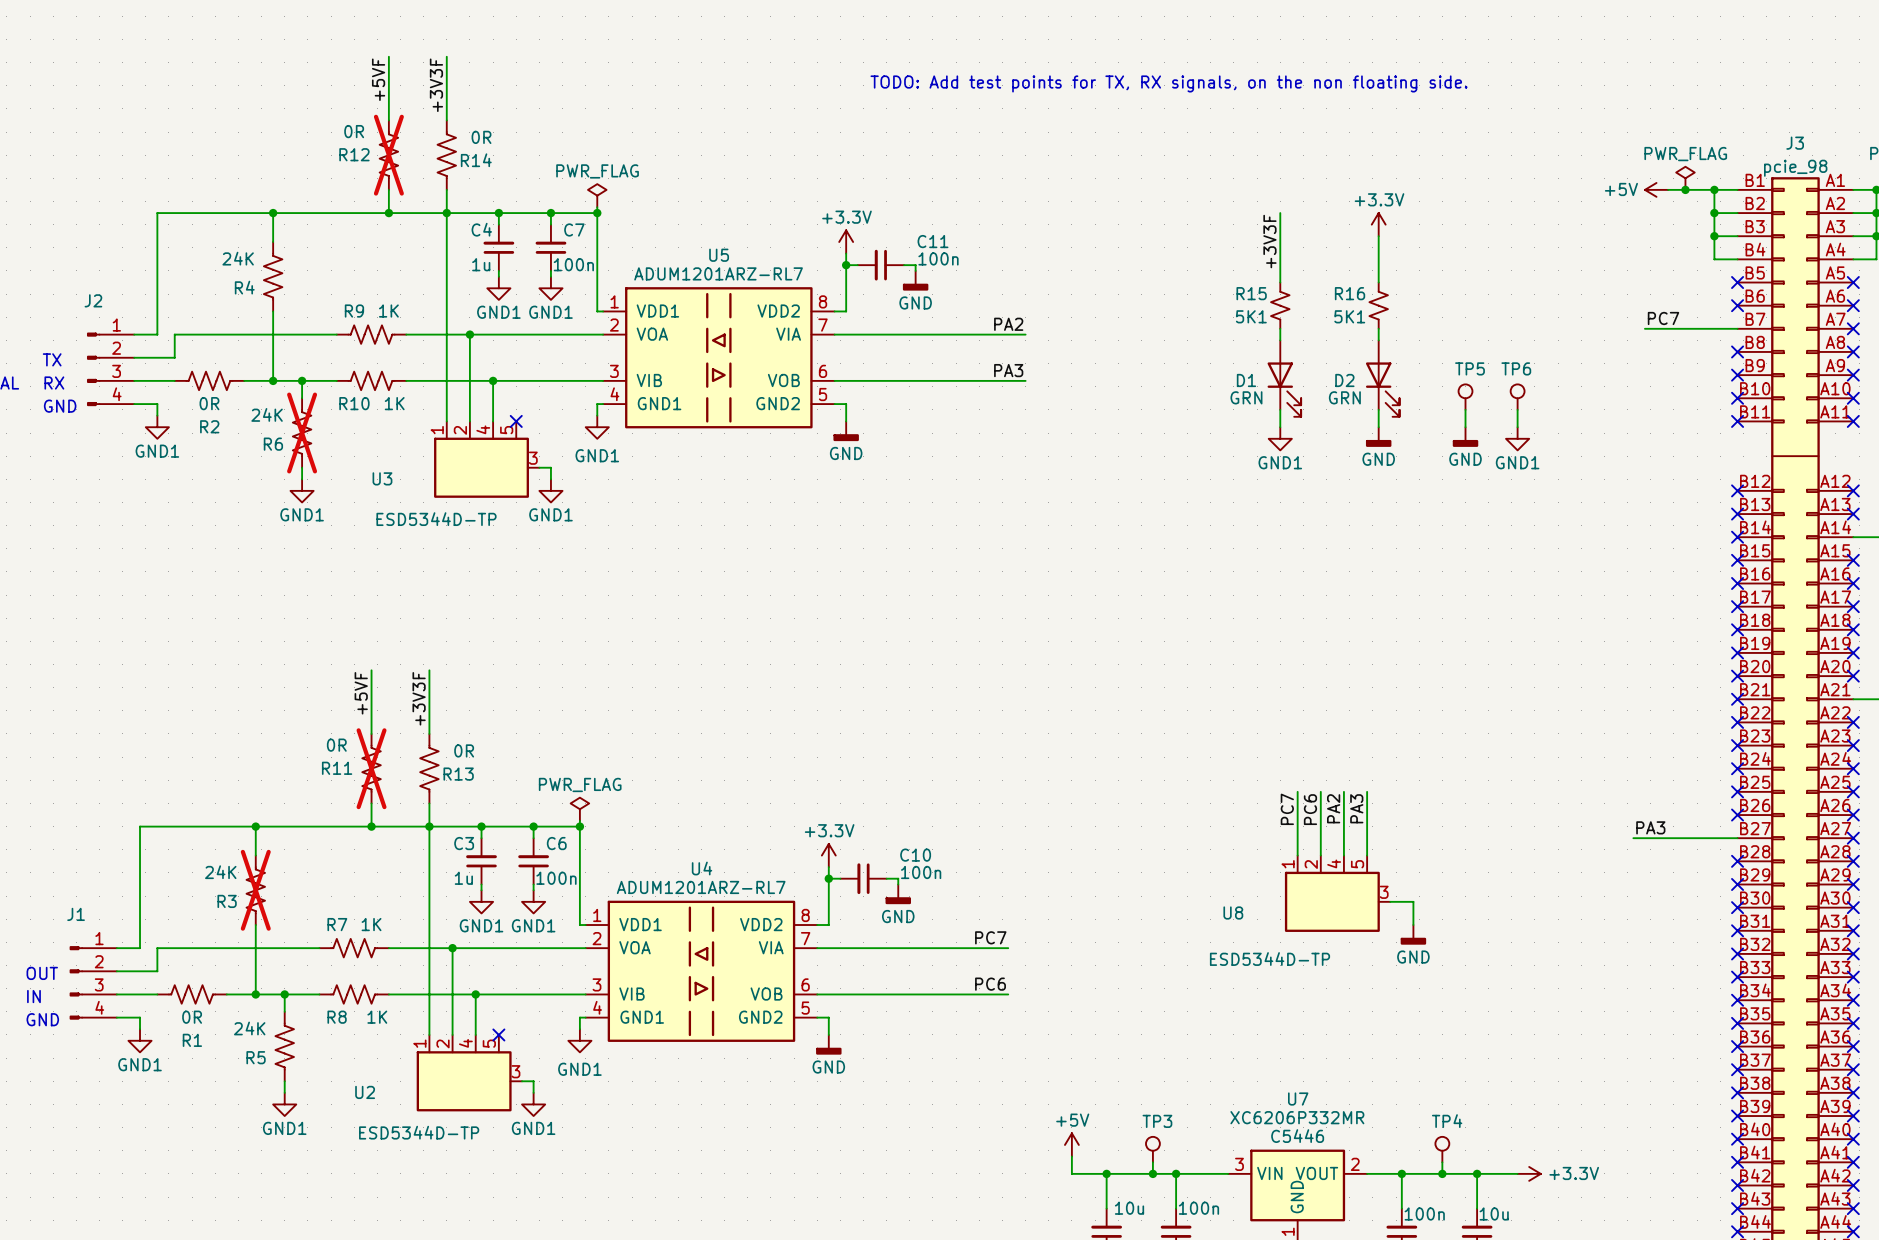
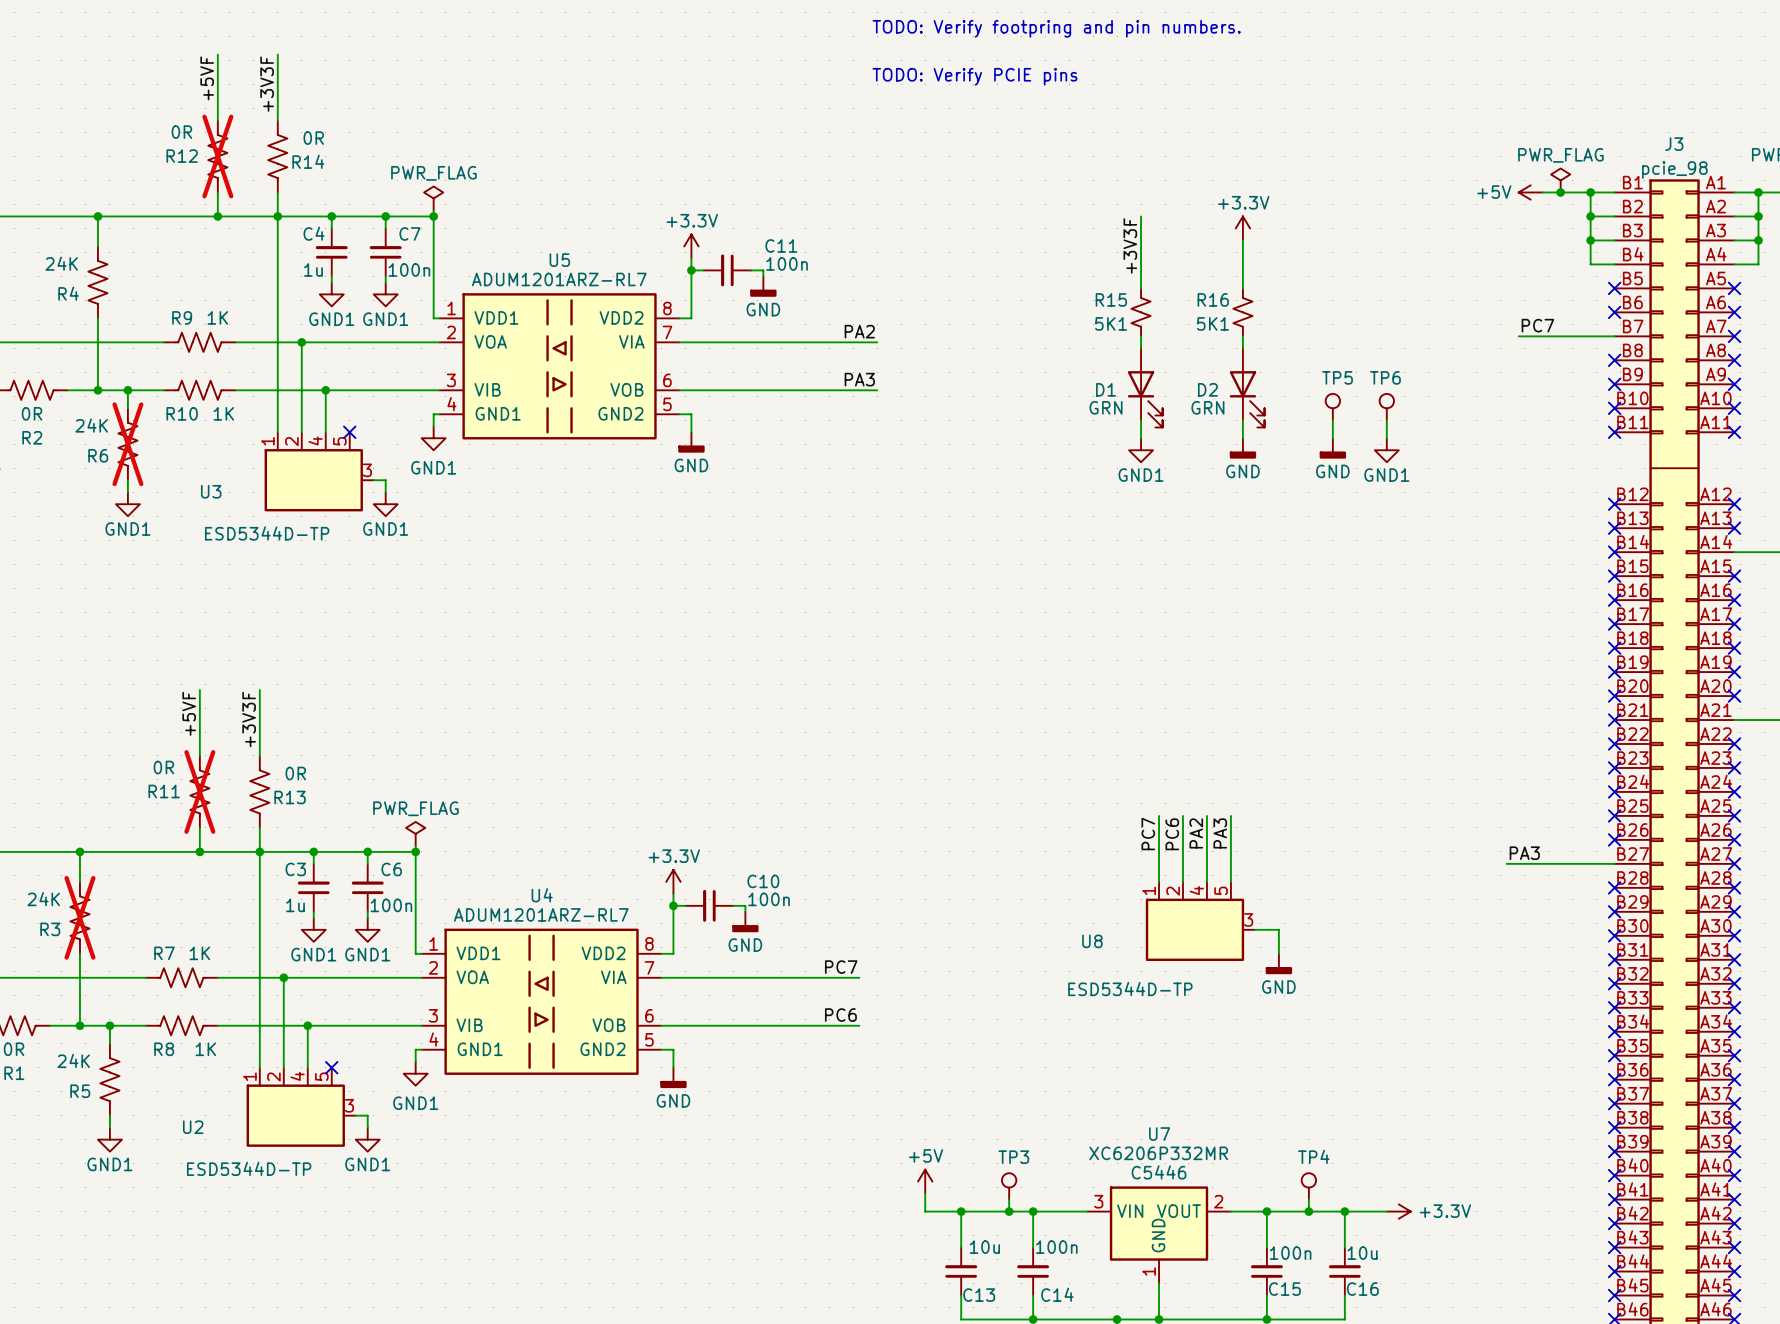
text: none -> TODO: Verify footpring and pin numbers. (1056, 28)
text: none -> TODO: Verify PCIE pins (974, 76)
text: TODO: Add test points for TX, RX signals, on the non floating side. (1169, 83) -> none

